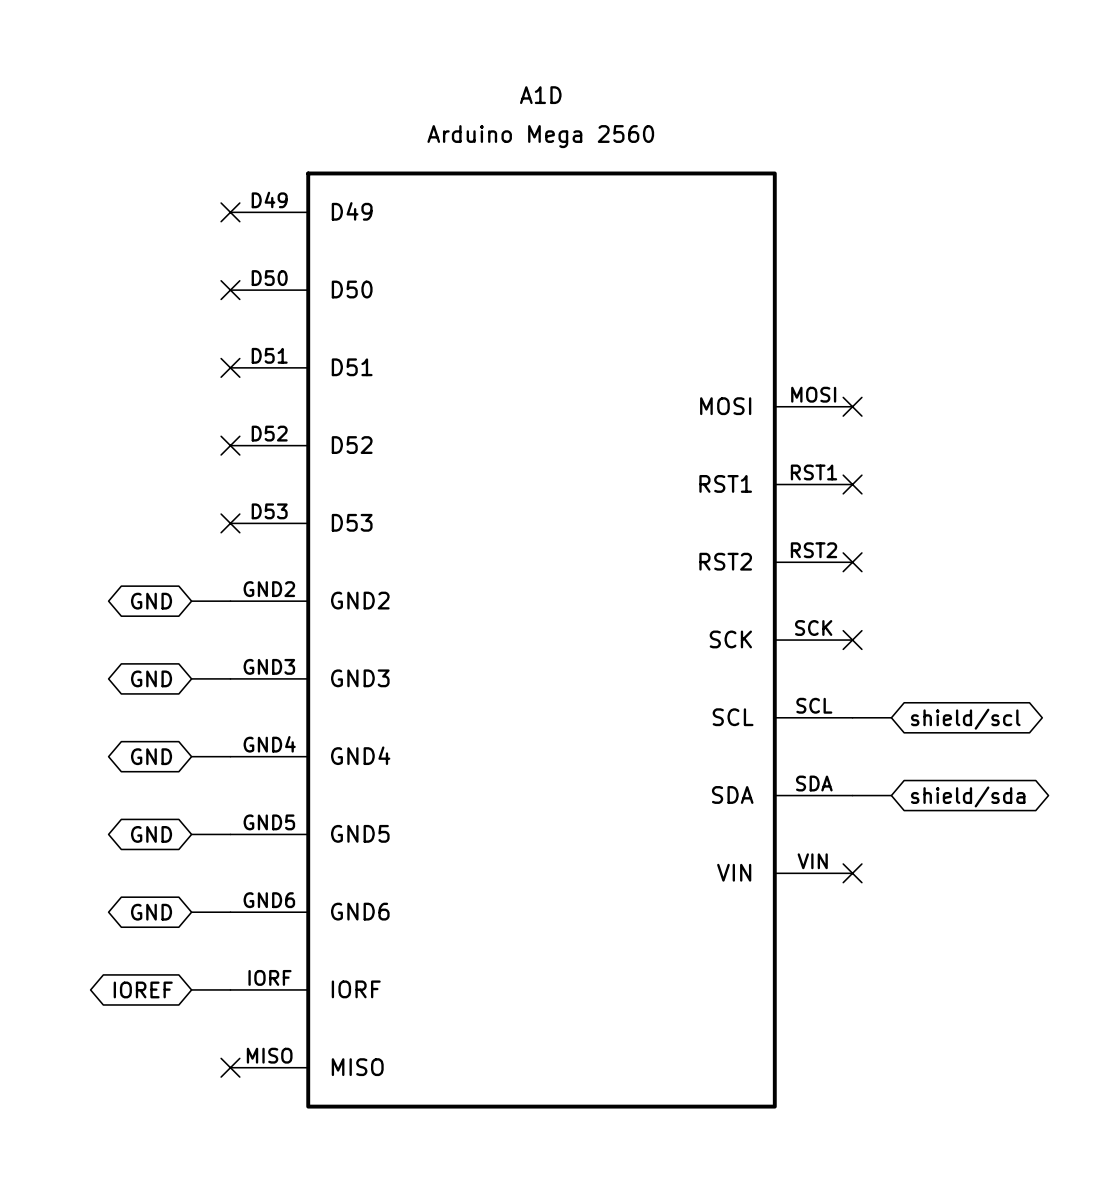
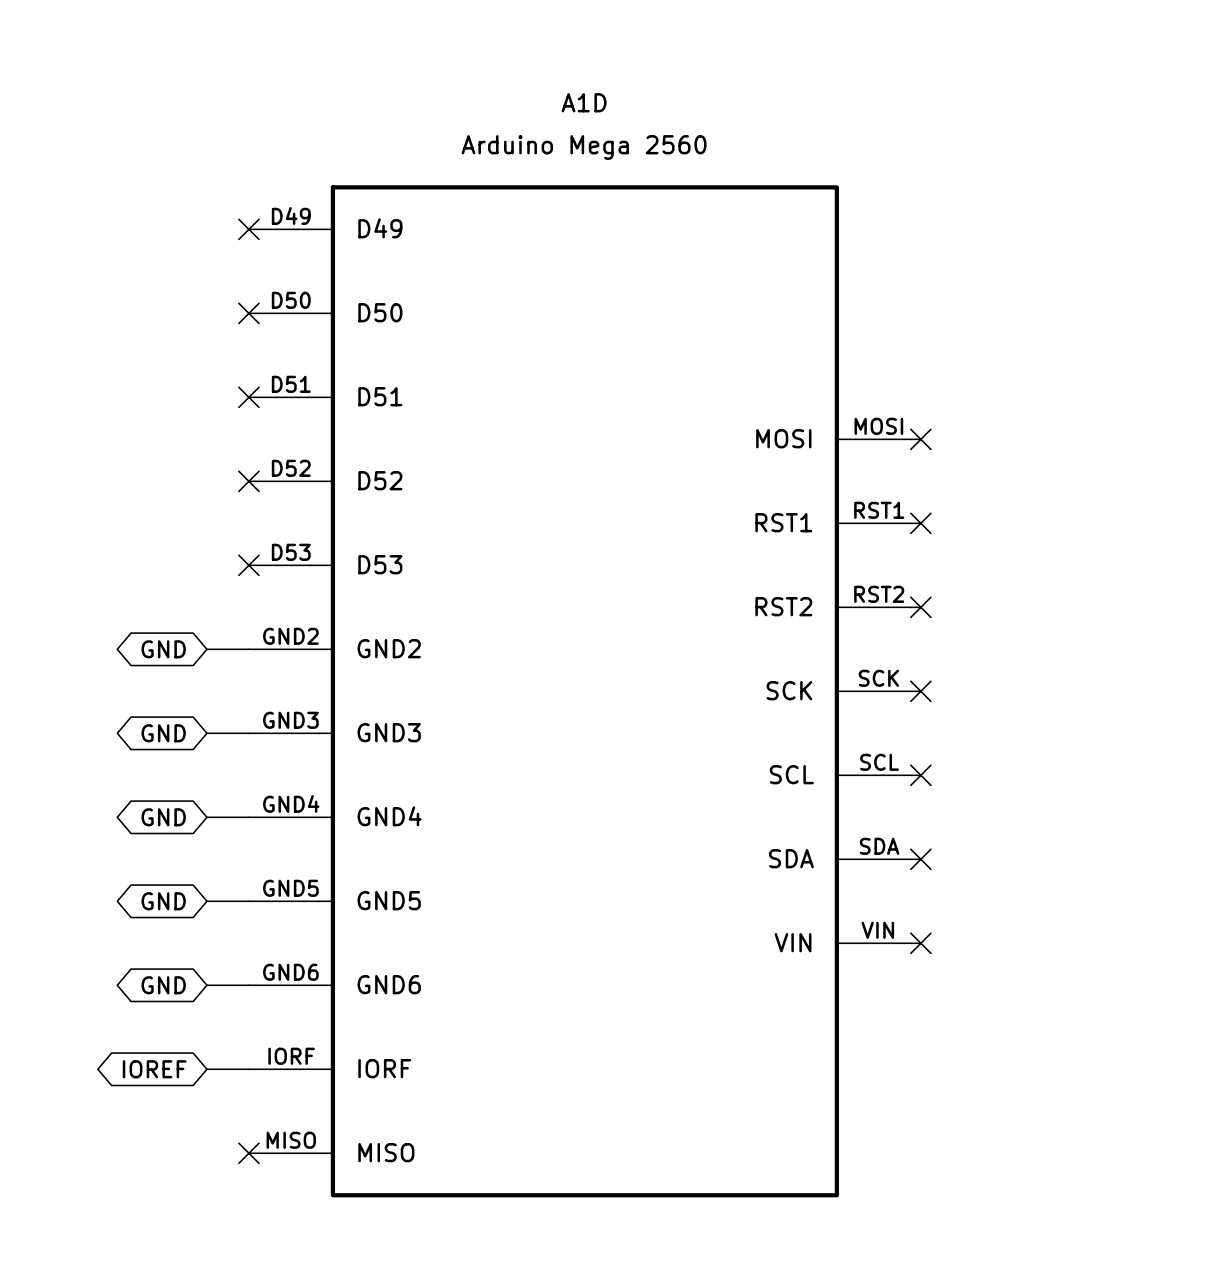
wire: (852, 717) (891, 717) -> none
no-connect mark: none -> (920, 775)
global label: shield/scl (965, 719) -> none
wire: (852, 795) (891, 795) -> none
no-connect mark: none -> (920, 859)
global label: shield/sda (968, 796) -> none

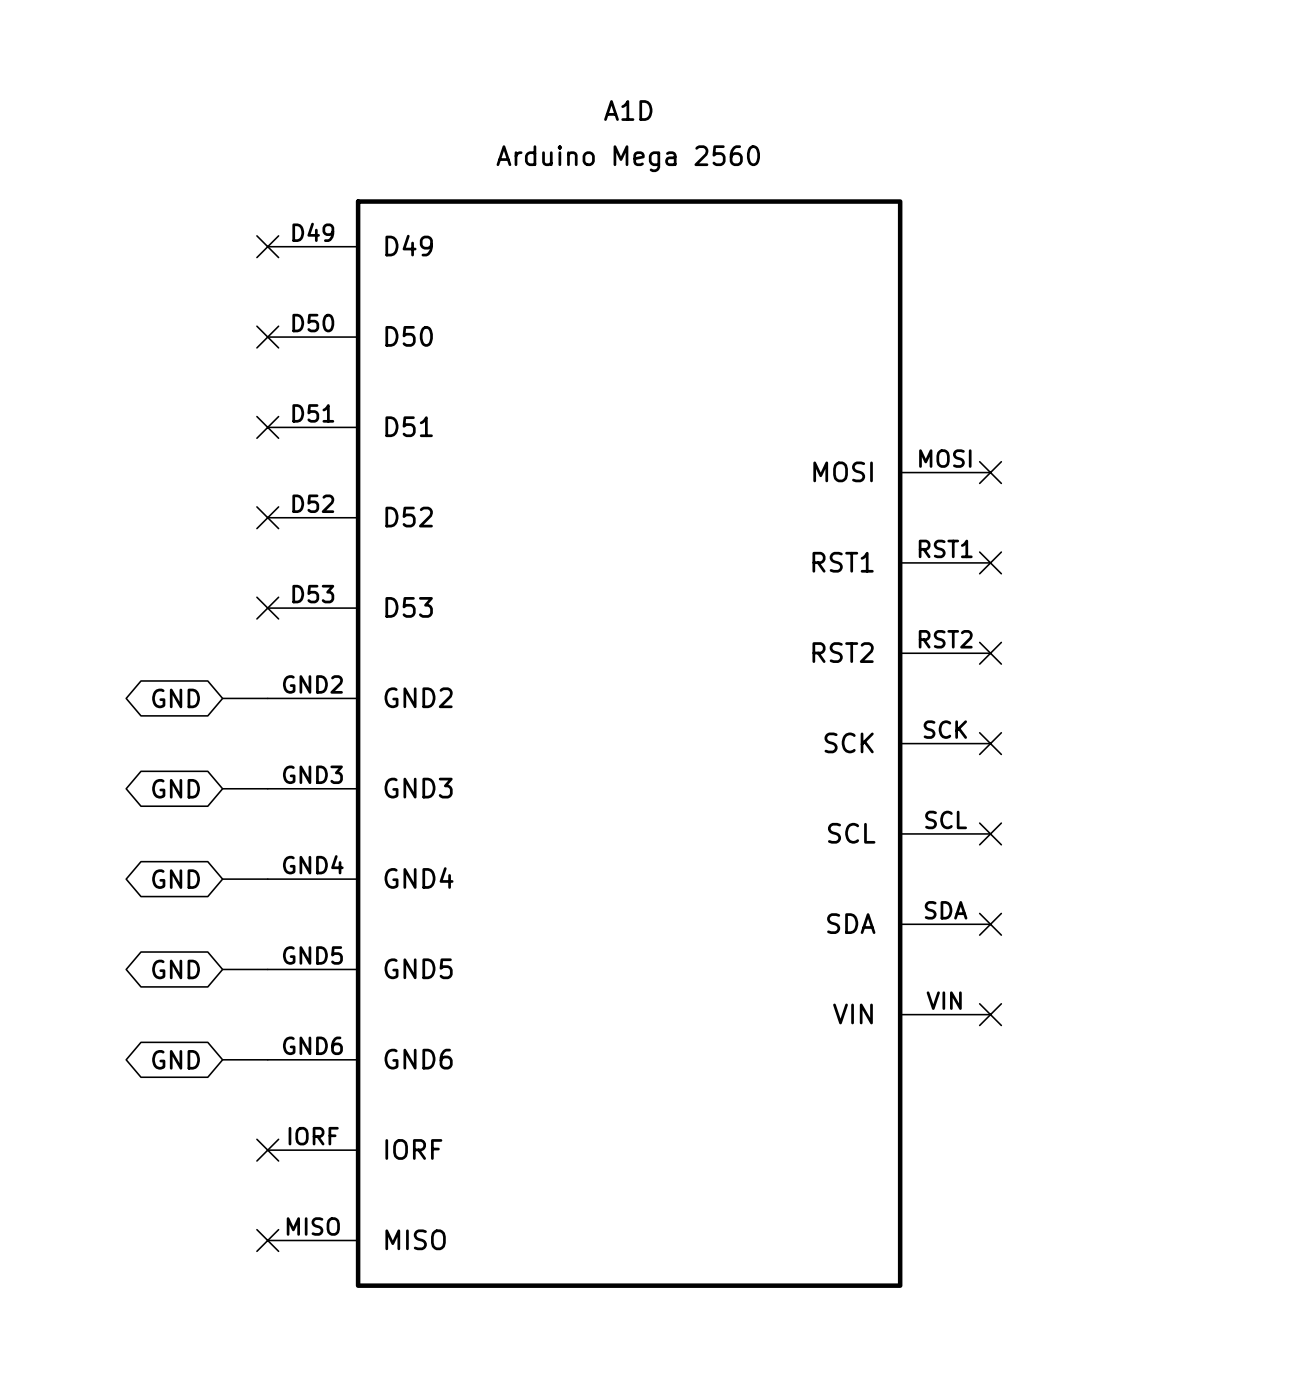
global label: IOREF (154, 1069) -> none
wire: (206, 1069) (248, 1069) -> none
no-connect mark: none -> (267, 1150)

